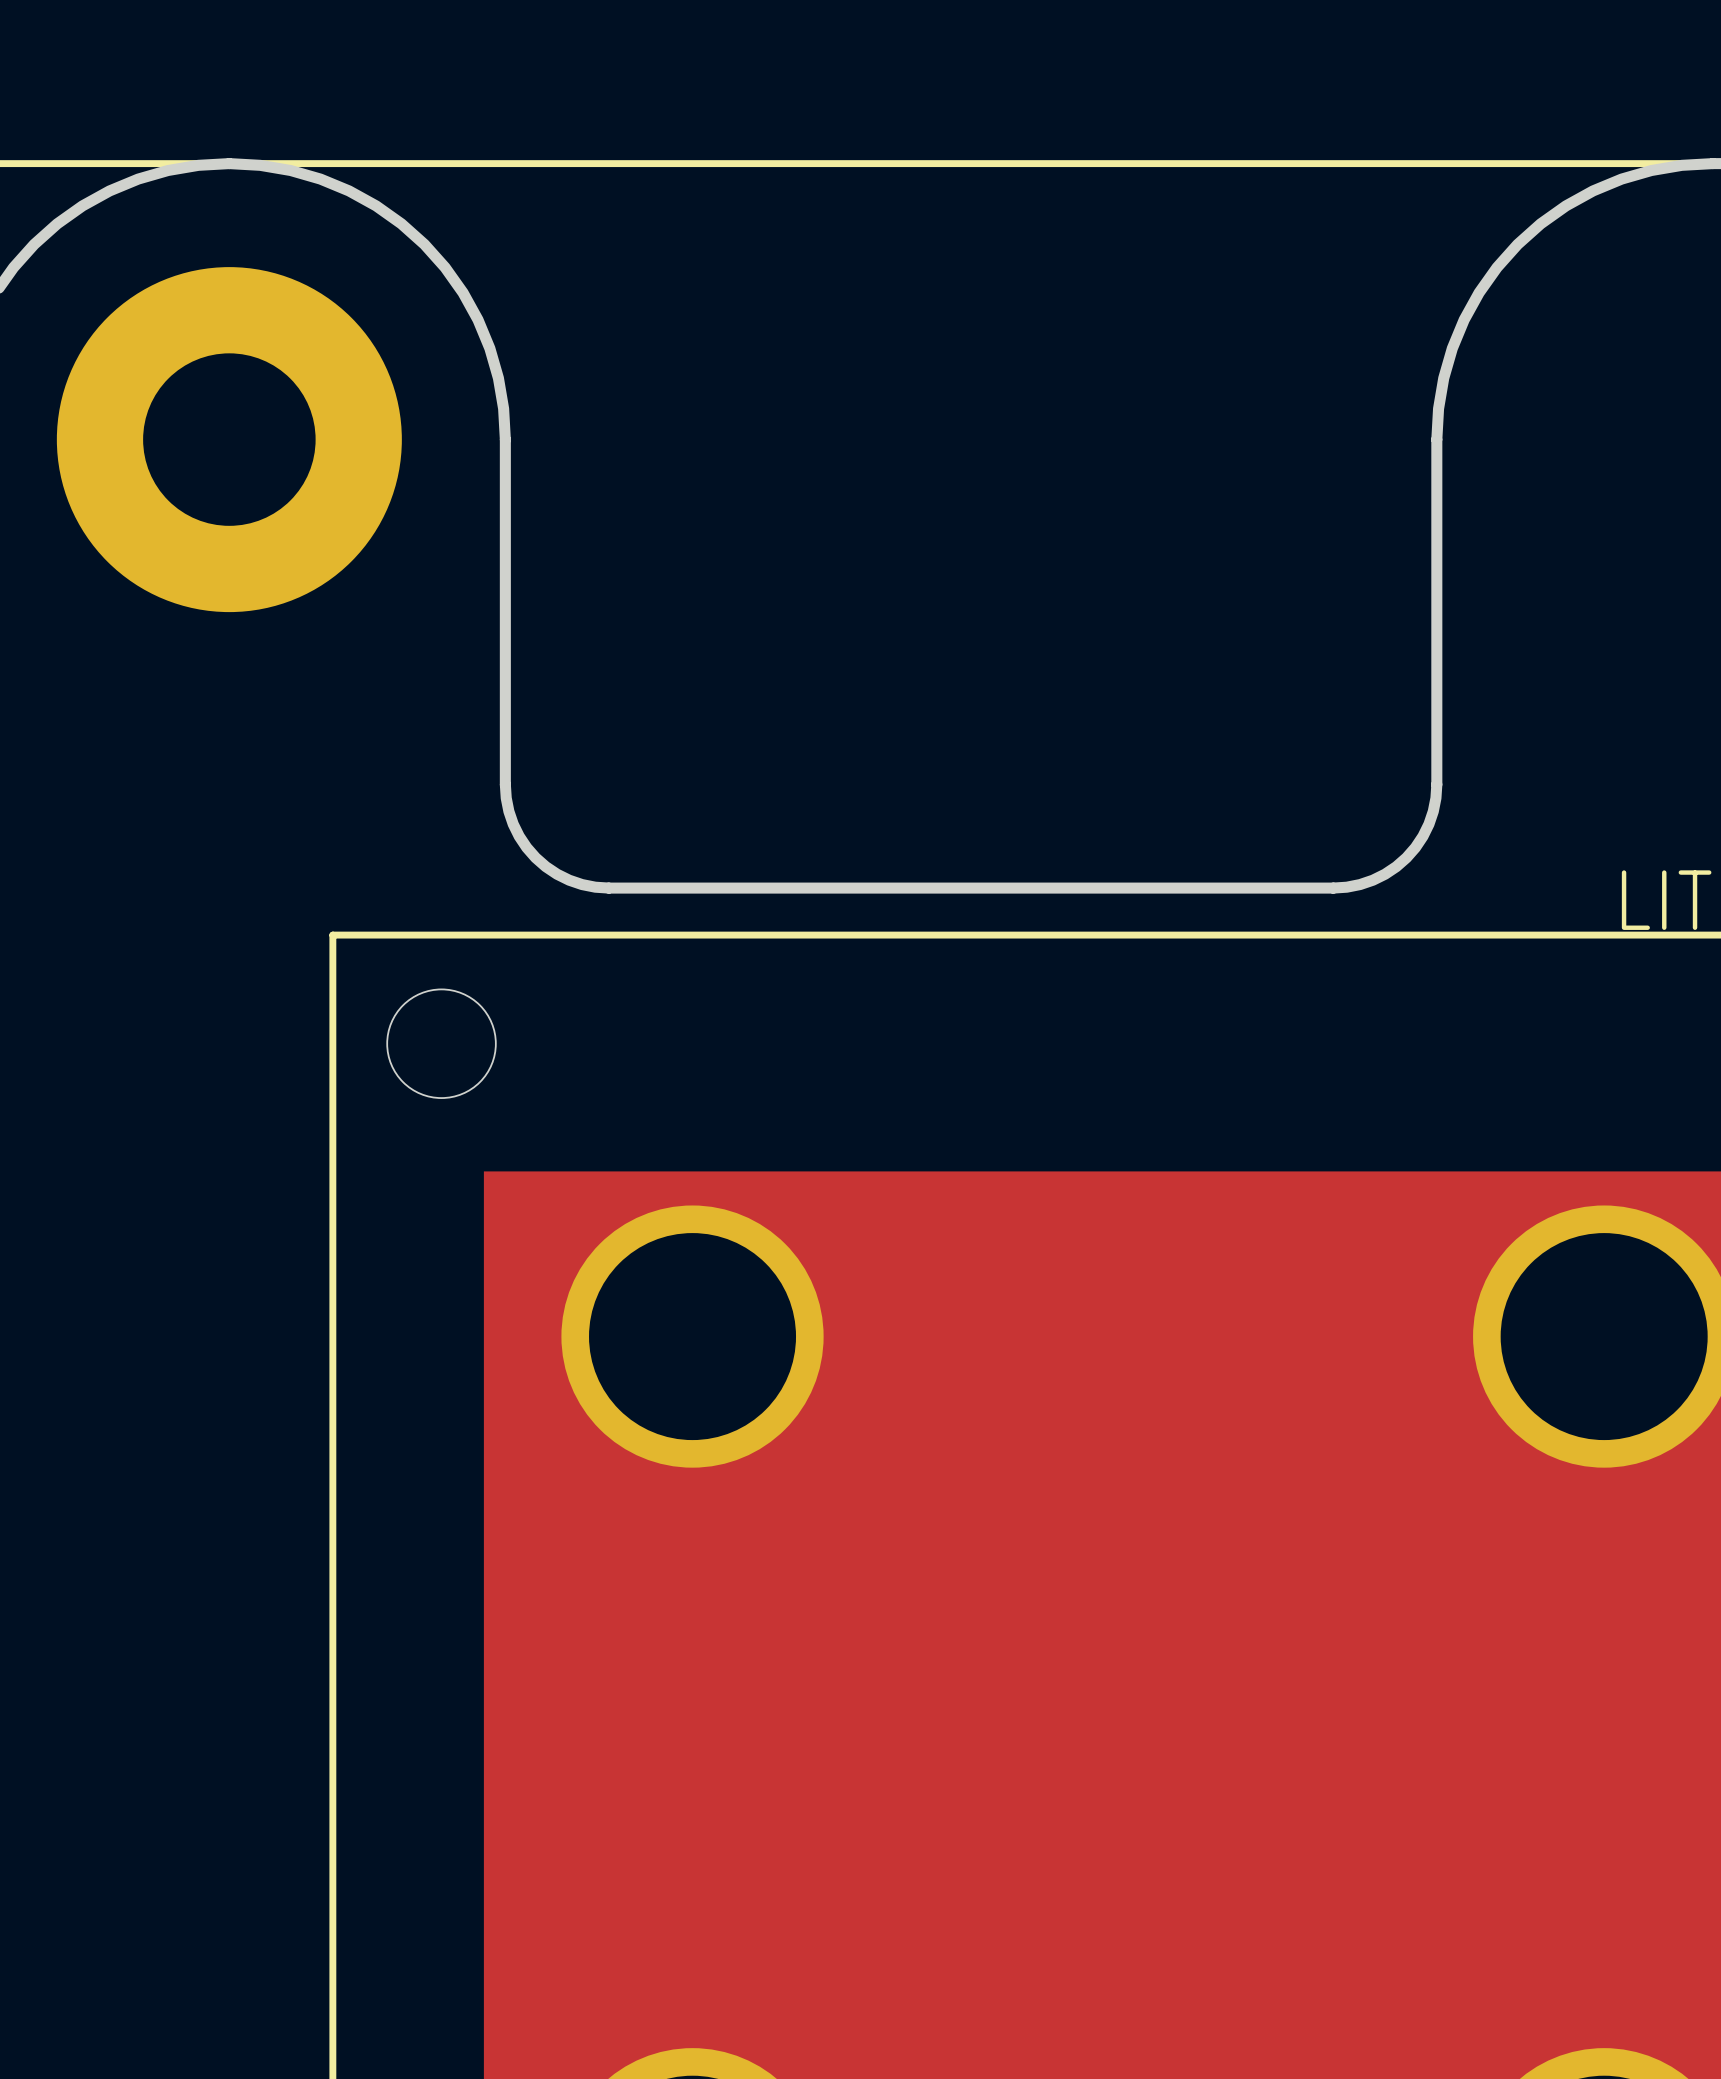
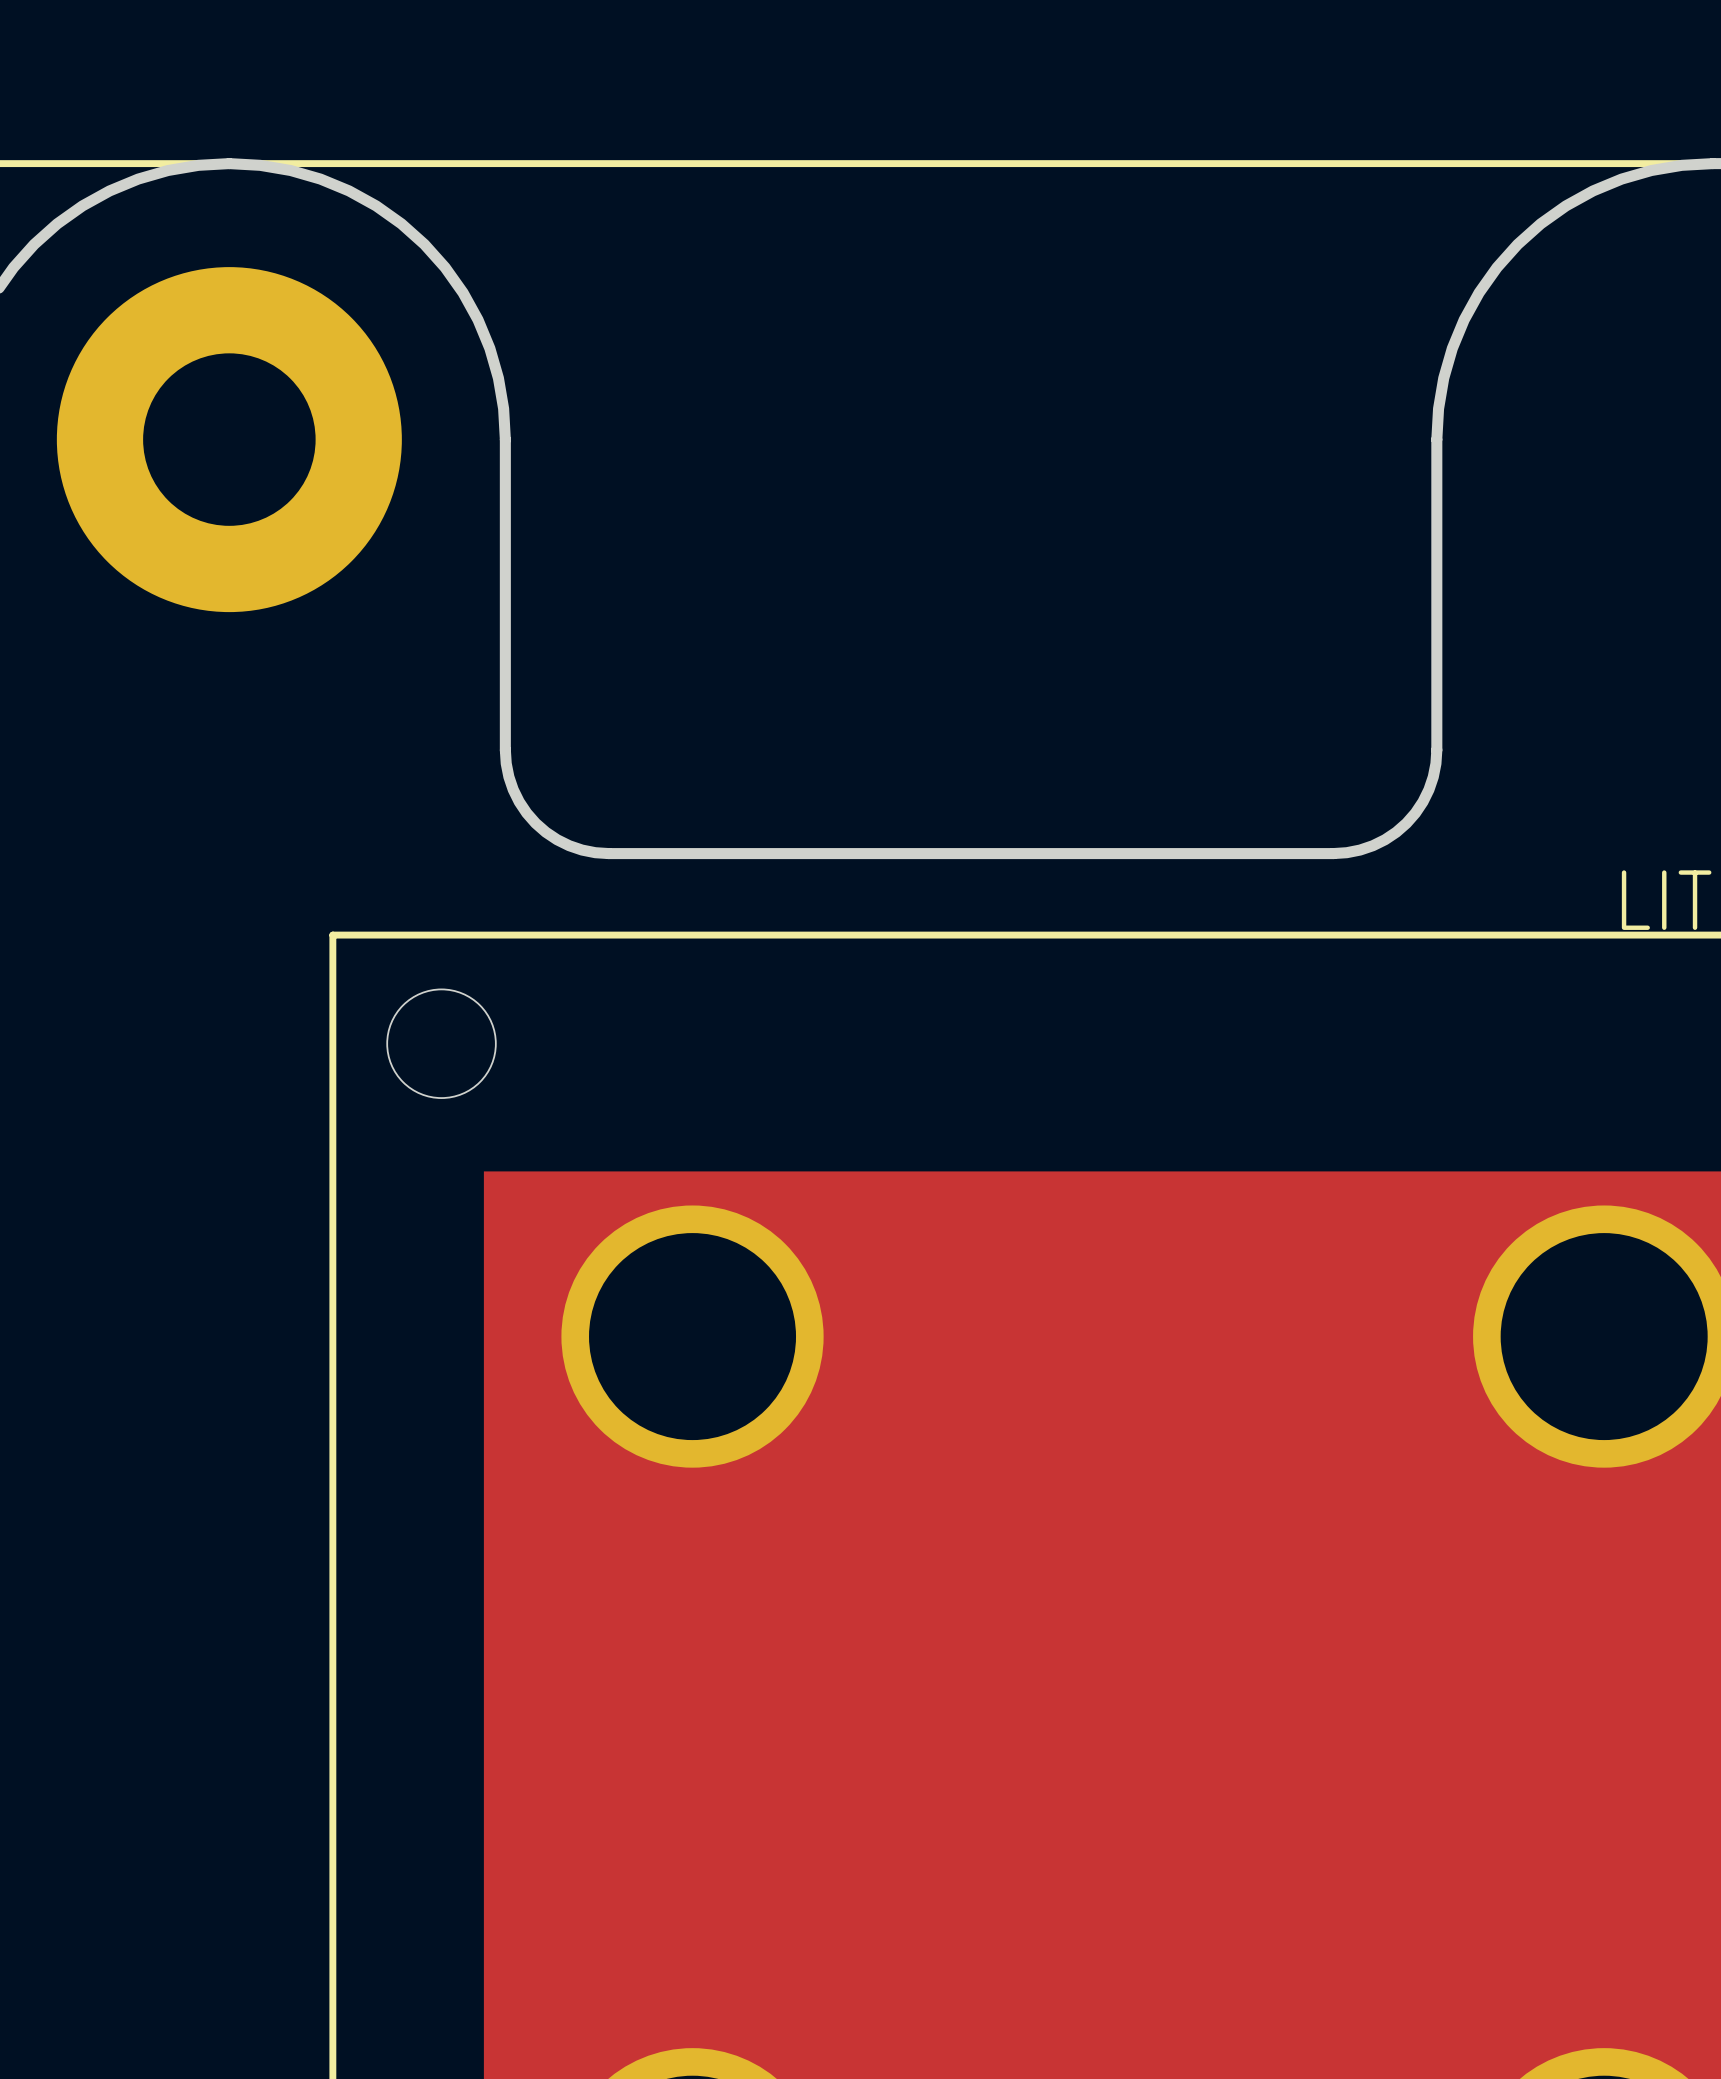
board edge: (505, 750) (505, 784) (508, 811) (519, 836) (526, 847) (545, 866) (557, 874) (582, 884) (608, 888) (1346, 887) (1360, 884) (1385, 874) (1406, 857) (1422, 836) (1433, 811) (1435, 798) (1436, 750) -> (505, 750) (508, 776) (513, 789) (519, 801) (535, 823) (557, 839) (569, 845) (582, 850) (608, 853) (1346, 852) (1360, 850) (1385, 839) (1396, 832) (1415, 813) (1422, 801) (1433, 776) (1436, 750)

